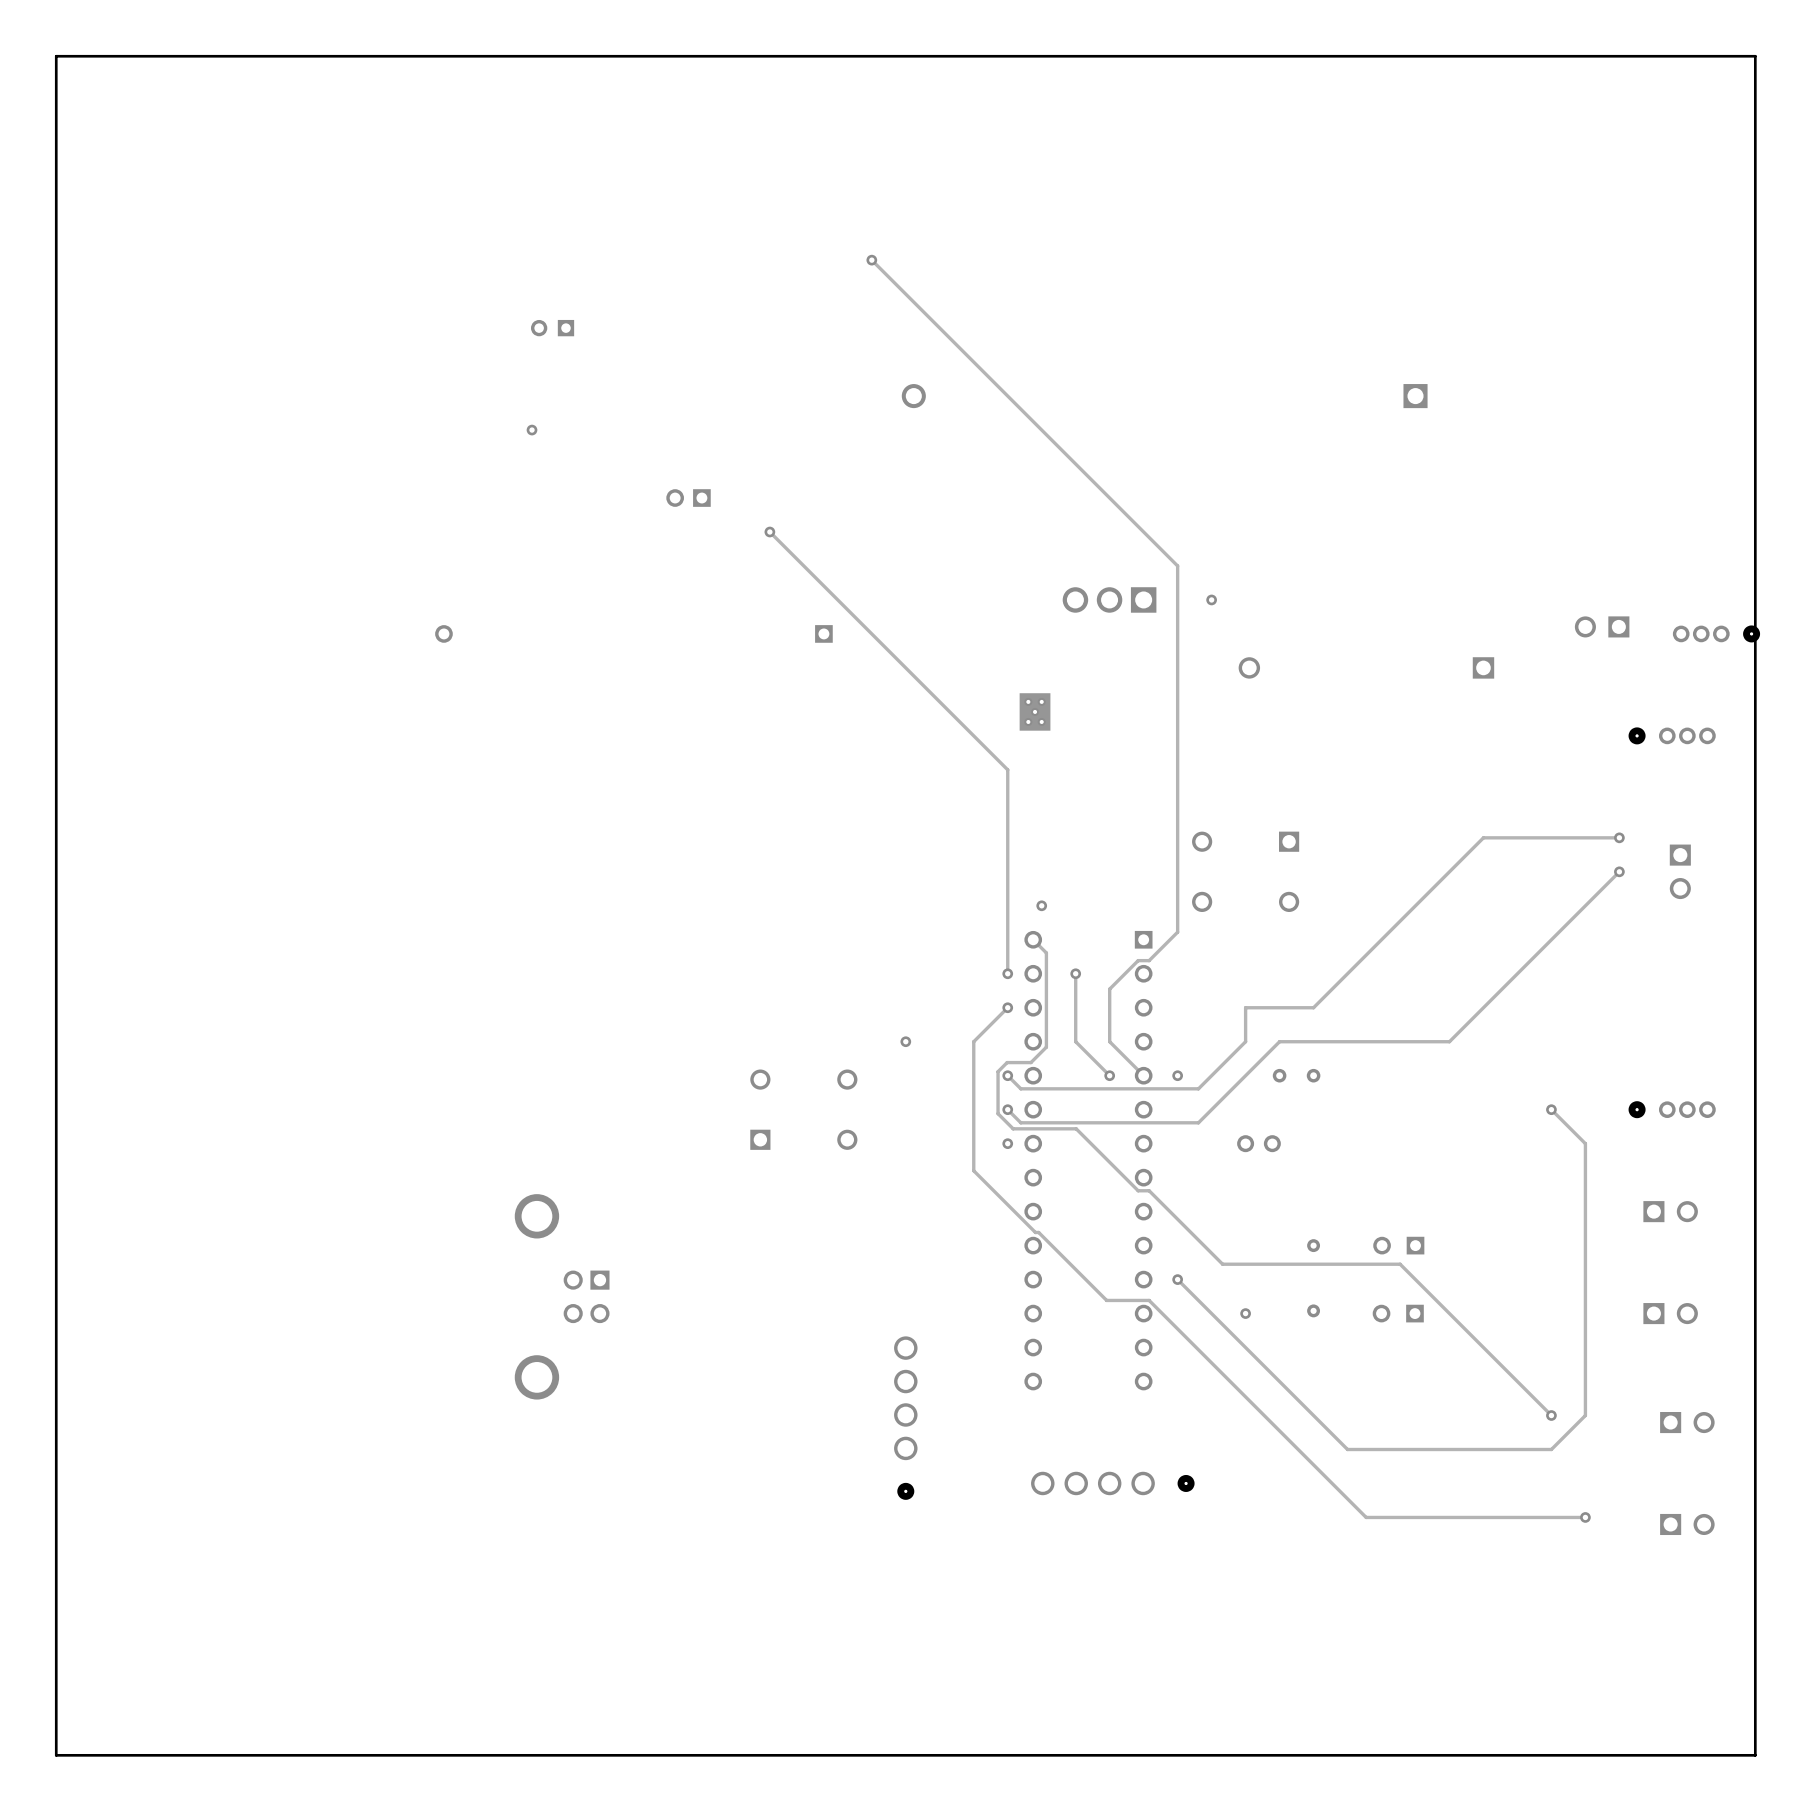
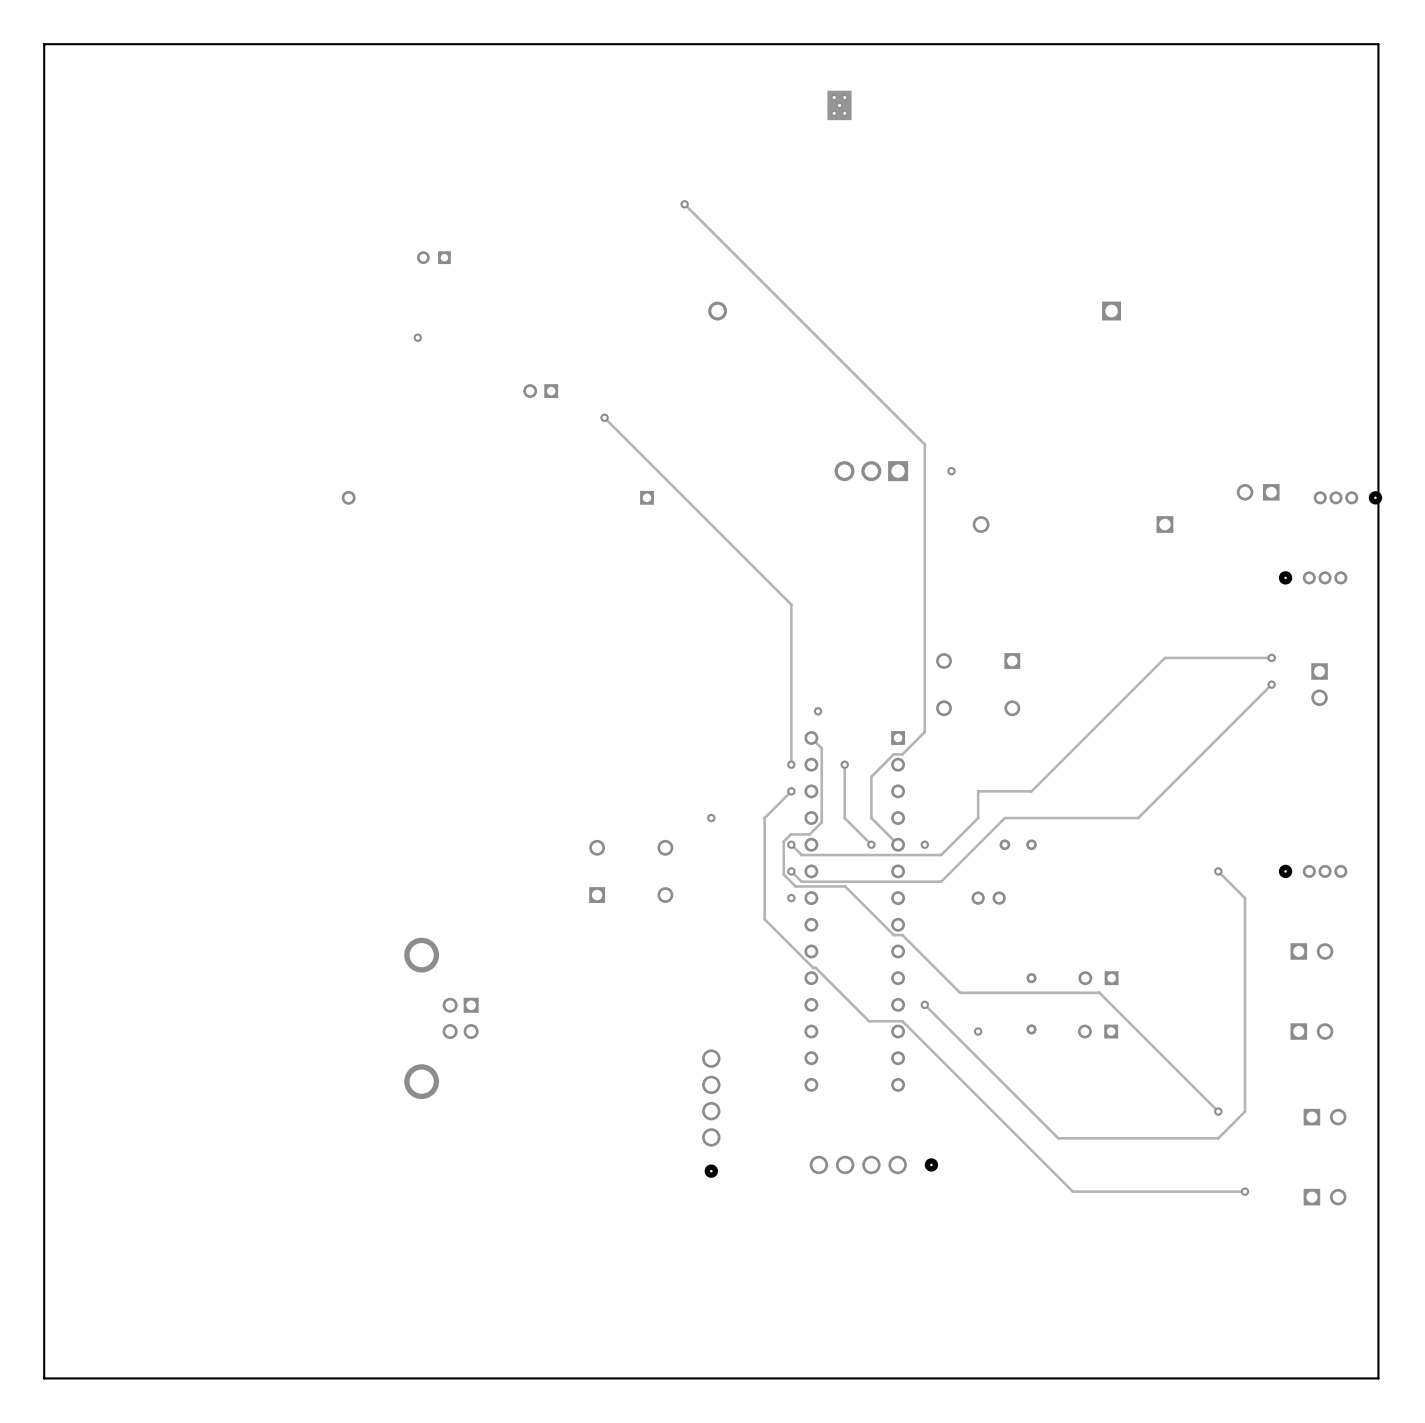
part: none -> (839, 105)
part: (1035, 711) -> none

